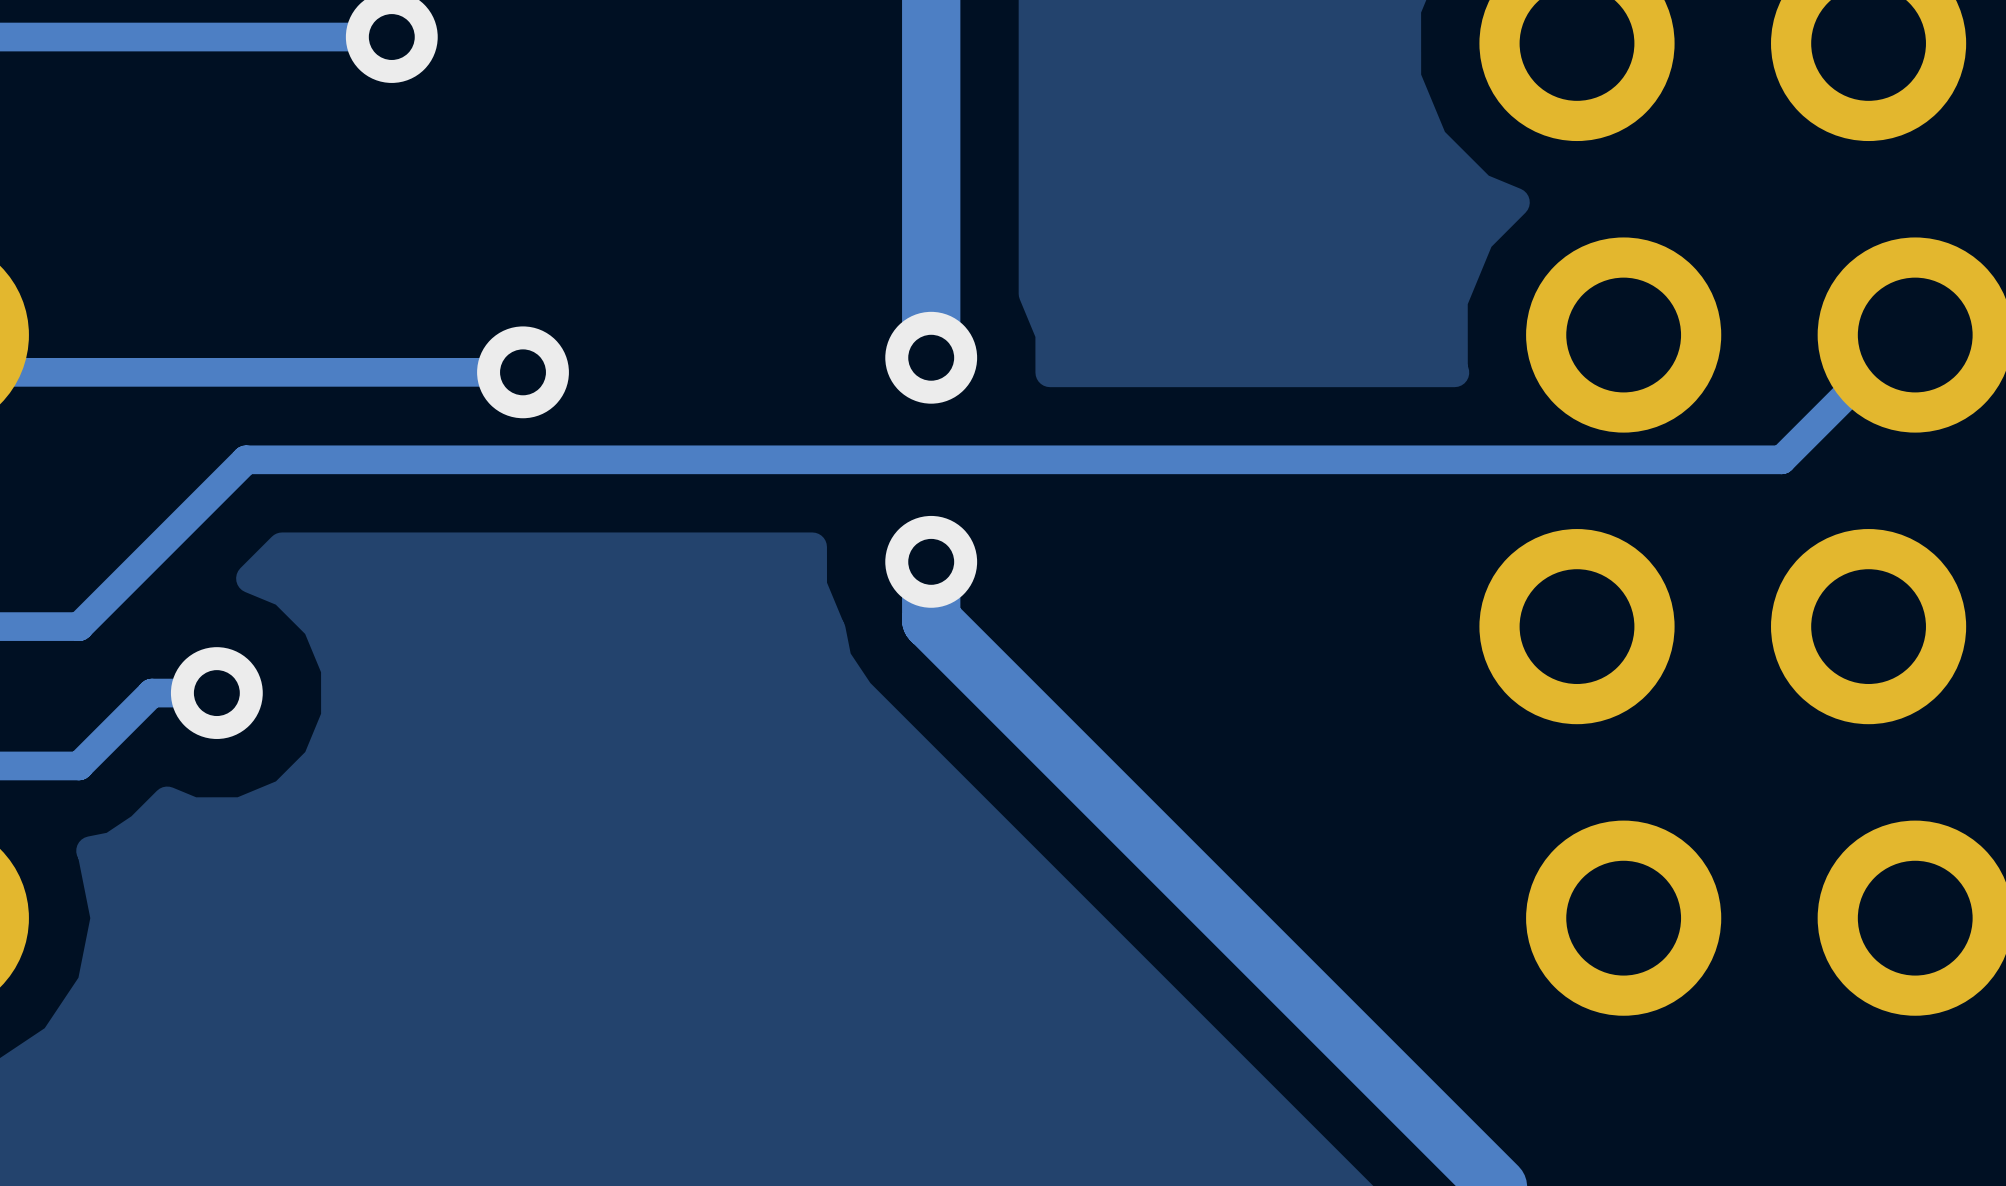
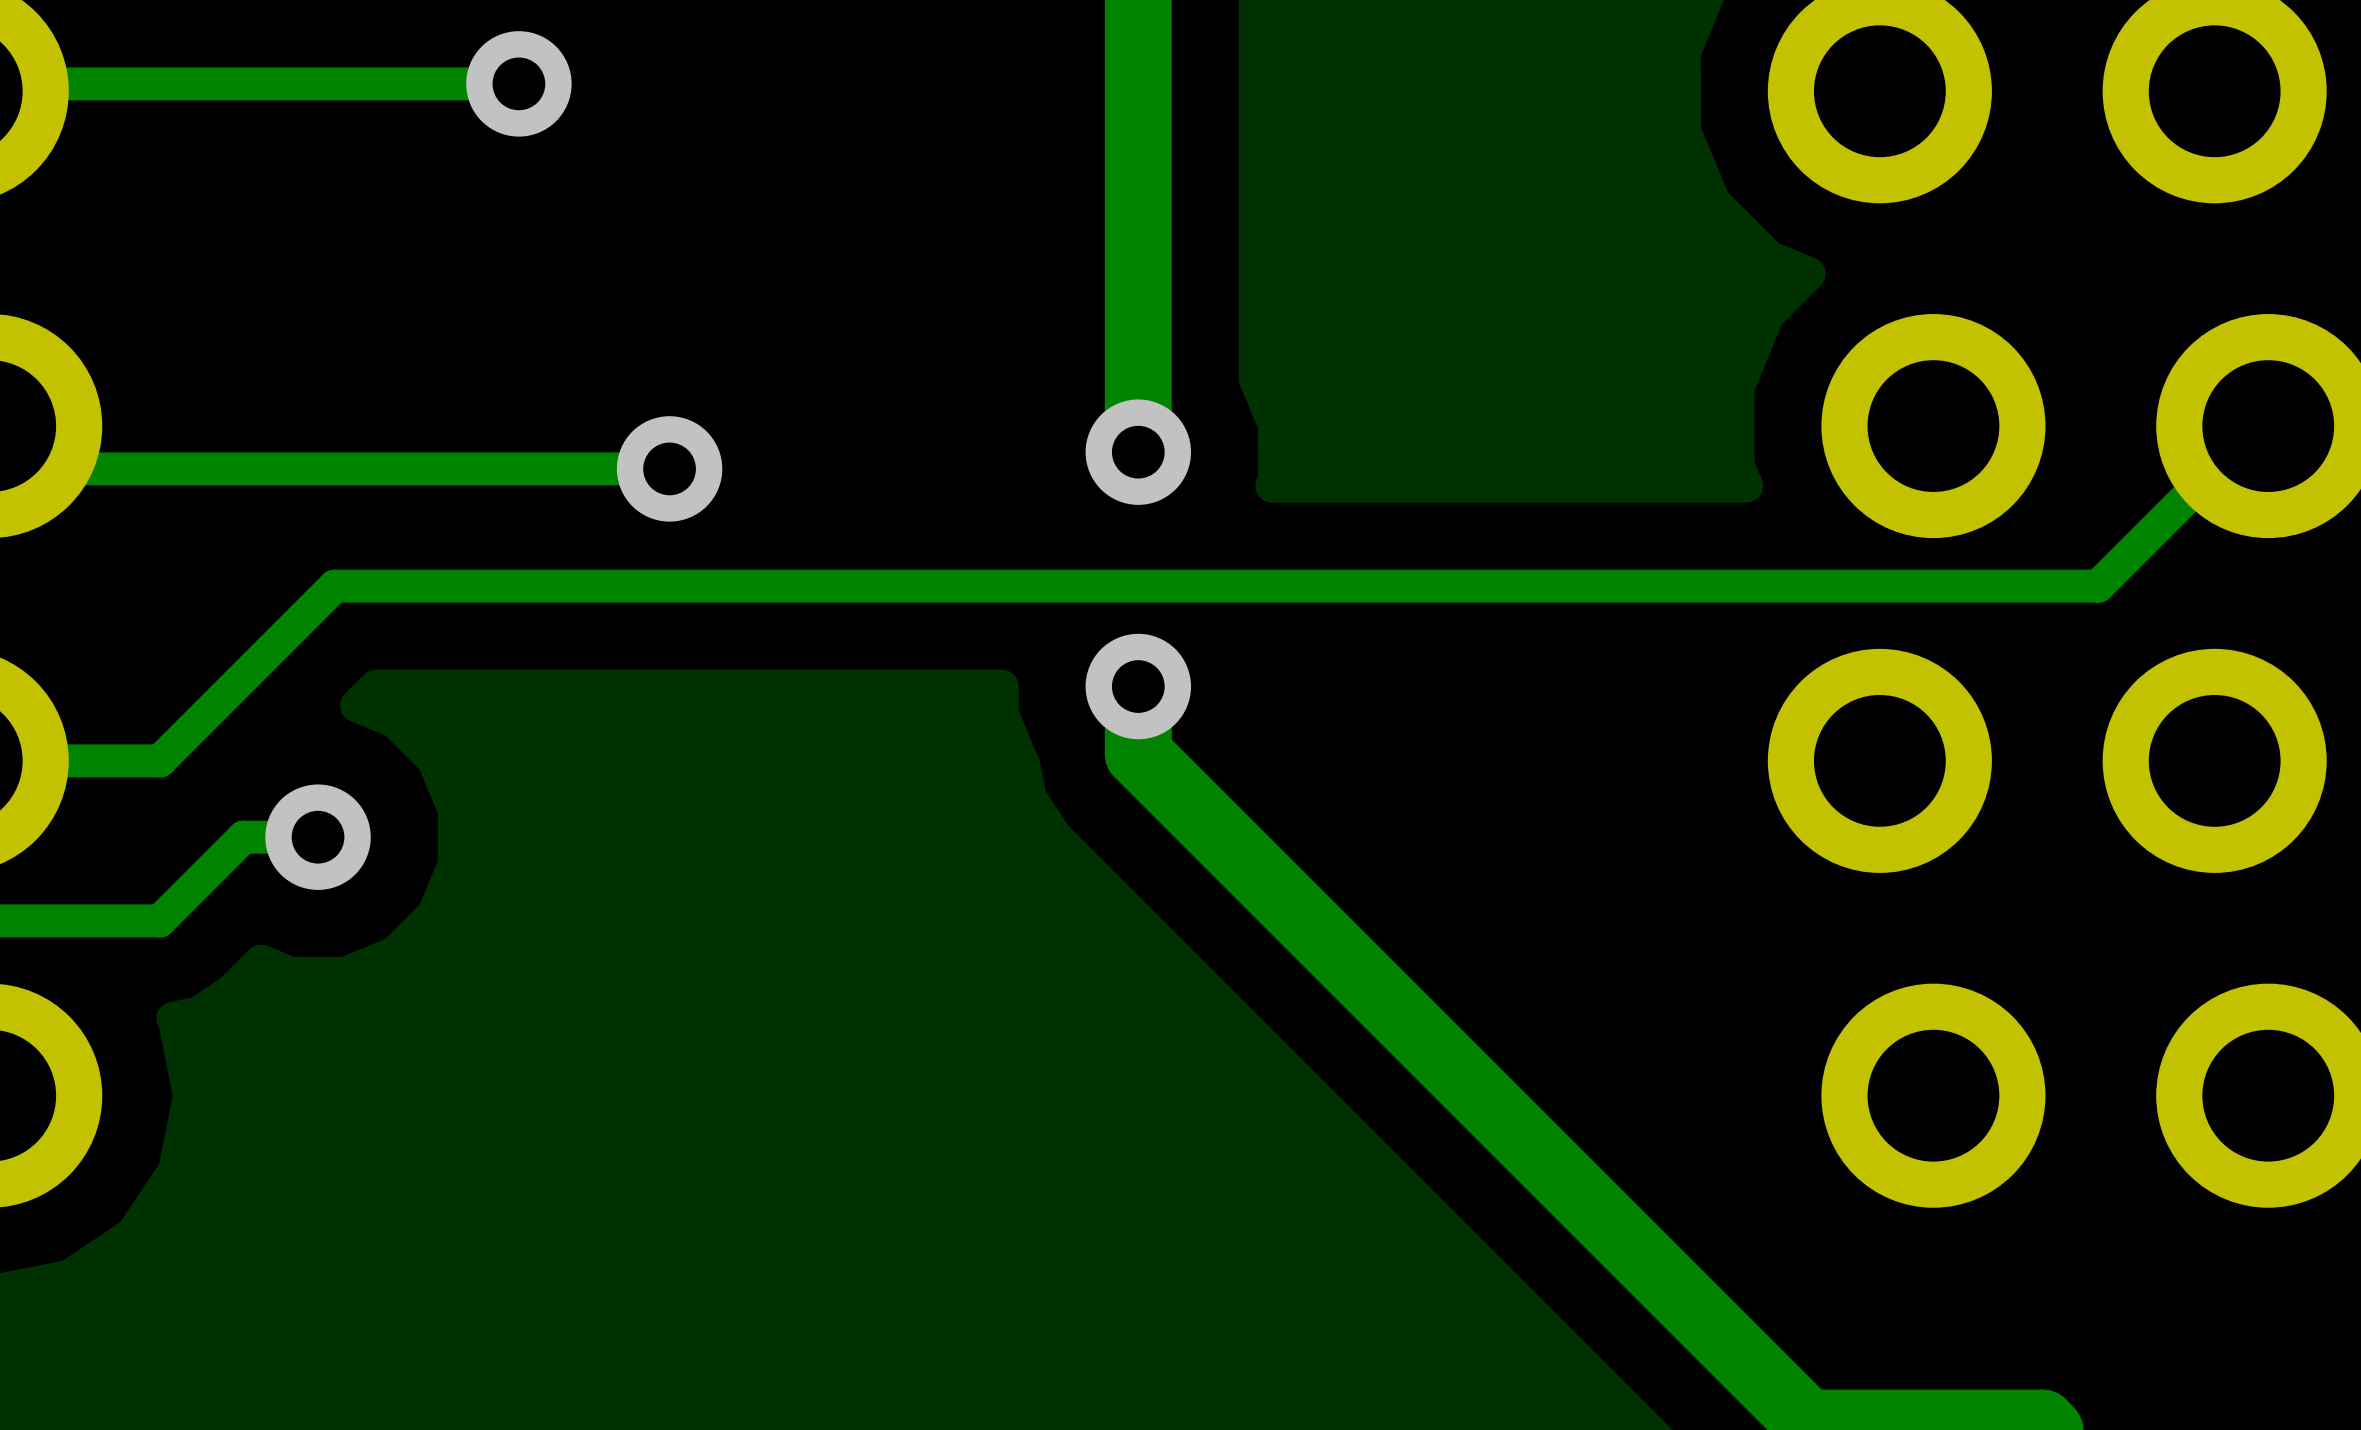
track: (1781, 459) (246, 459) (231, 474) -> (2114, 569) (2098, 586) (334, 586)

